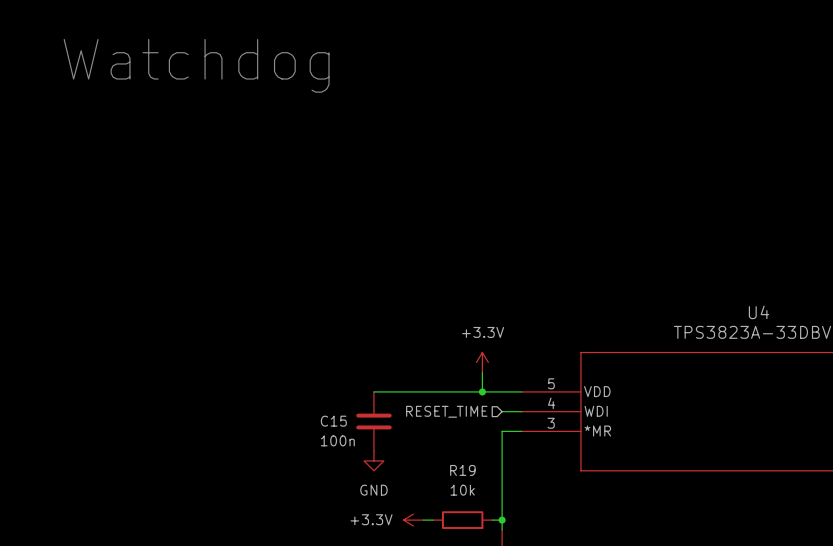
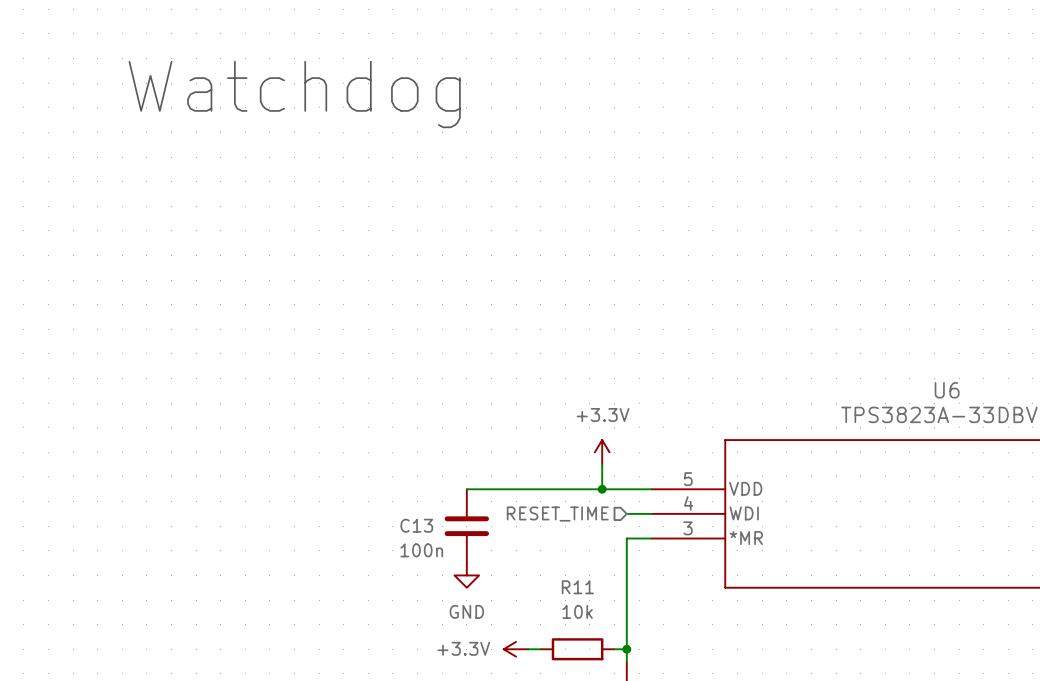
text position: Watchdog (196, 65) -> Watchdog (294, 94)
U4 name: U4 (758, 312) -> U6 (947, 390)
C15 name: C15 (333, 421) -> C13 (416, 525)
R19 name: R19 (462, 470) -> R11 (577, 587)

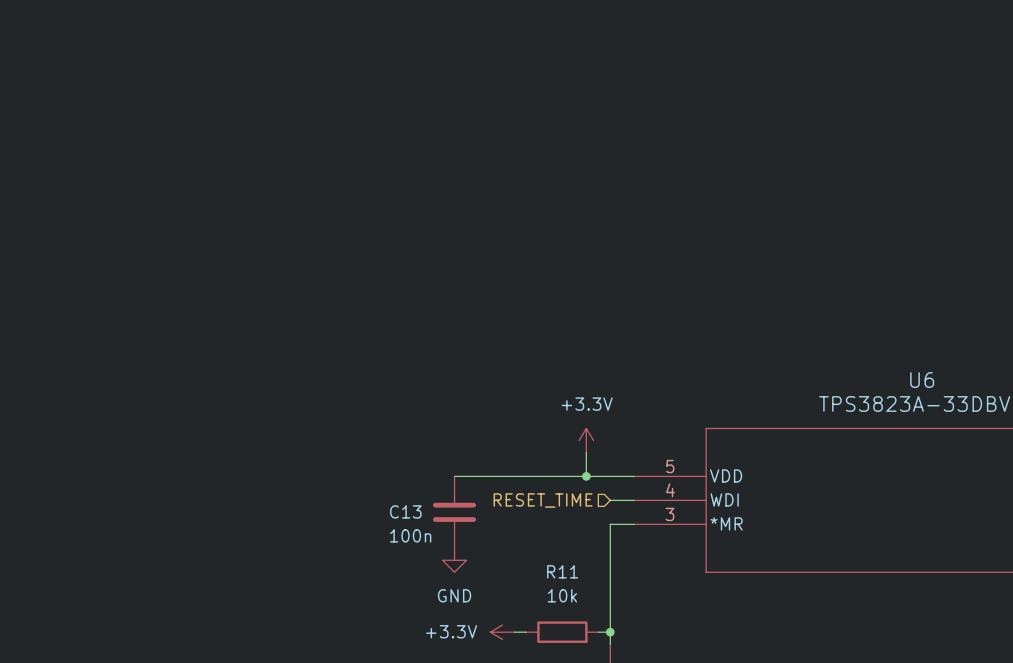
text: Watchdog (294, 94) -> none

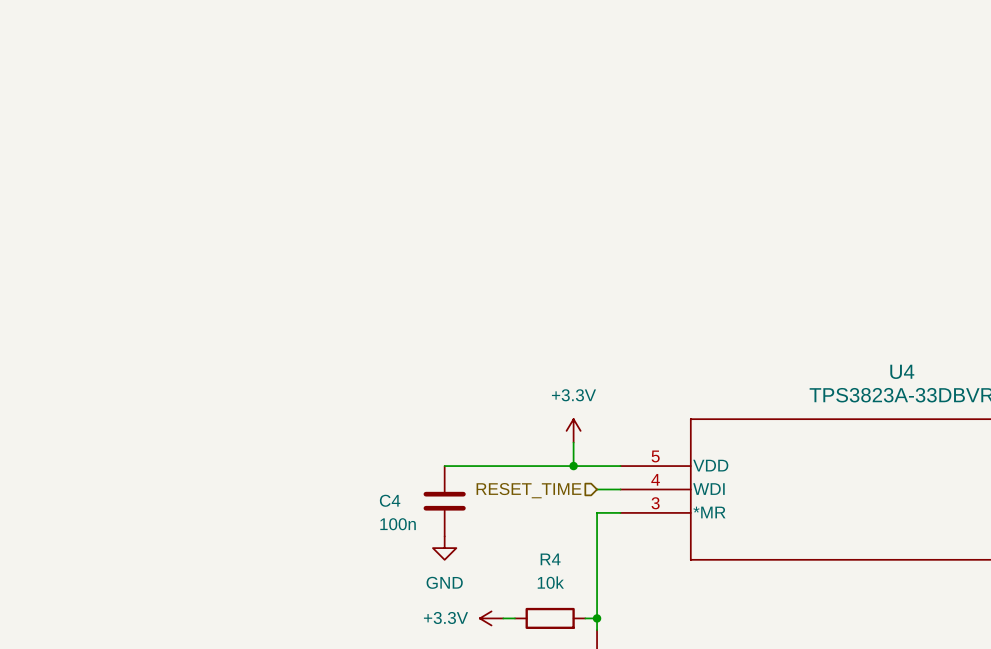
U6 name: U6 (922, 380) -> U4 (902, 371)
C13 name: C13 (405, 511) -> C4 (390, 500)
R11 name: R11 (562, 571) -> R4 (550, 559)

